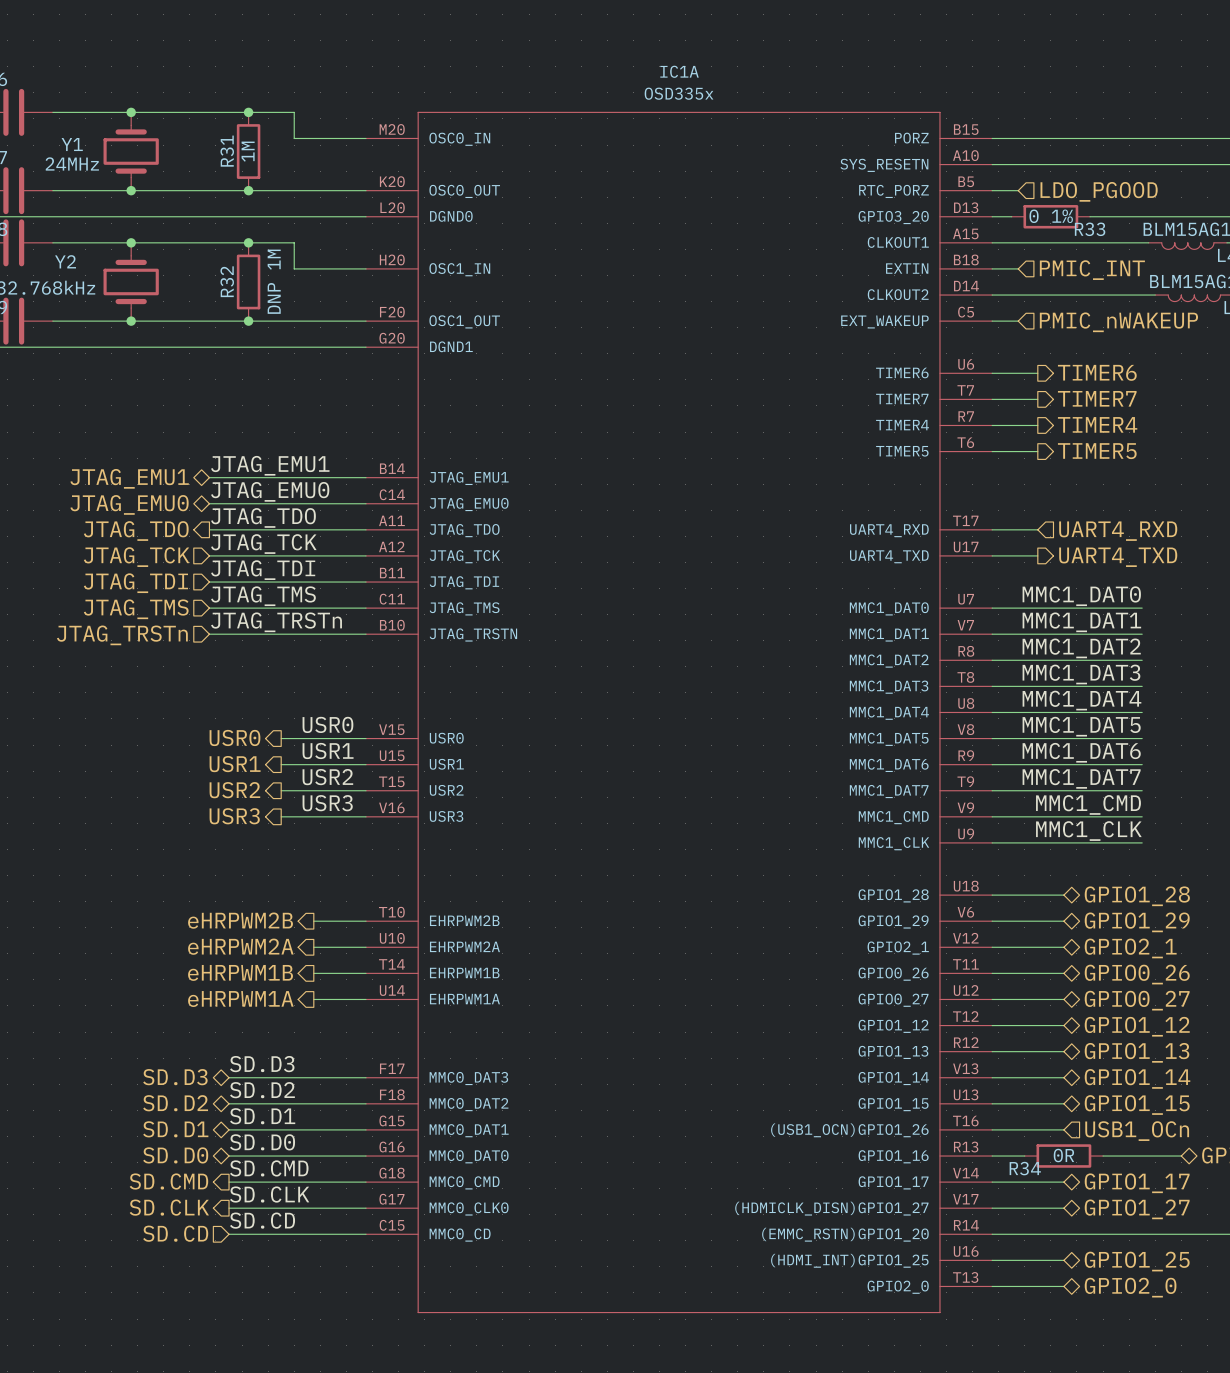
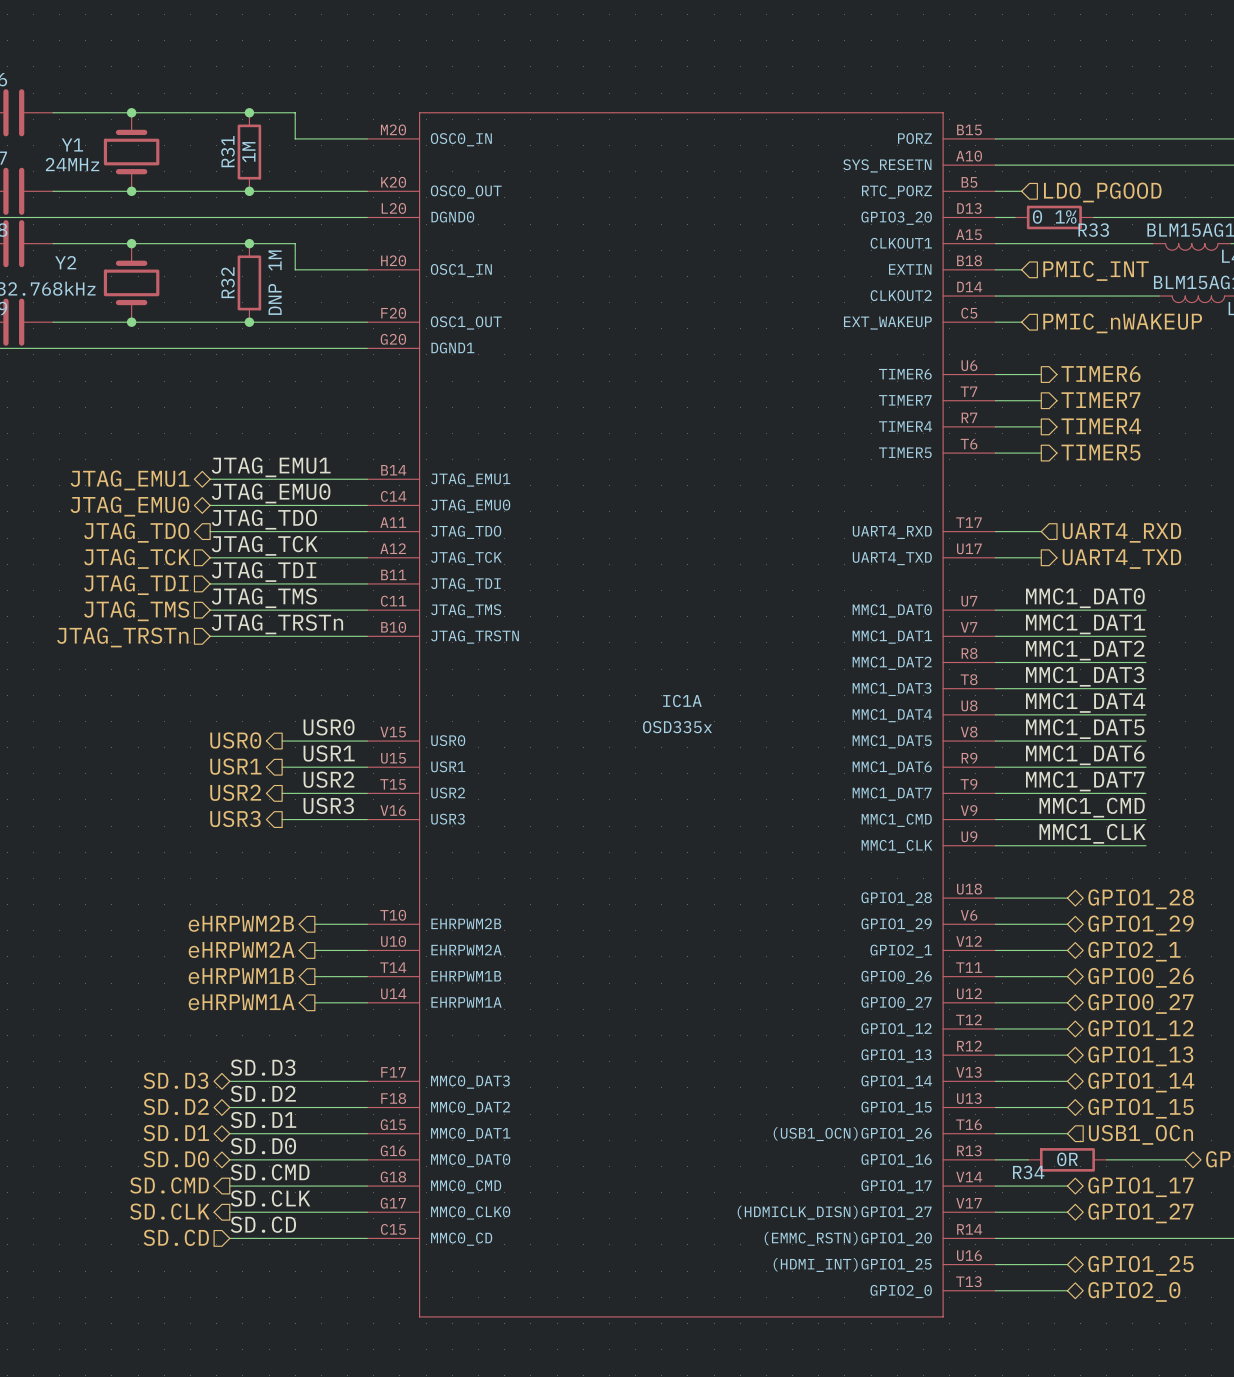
IC1A name position: IC1A (679, 71) -> IC1A (682, 700)
IC1A value position: OSD335x (679, 93) -> OSD335x (677, 727)

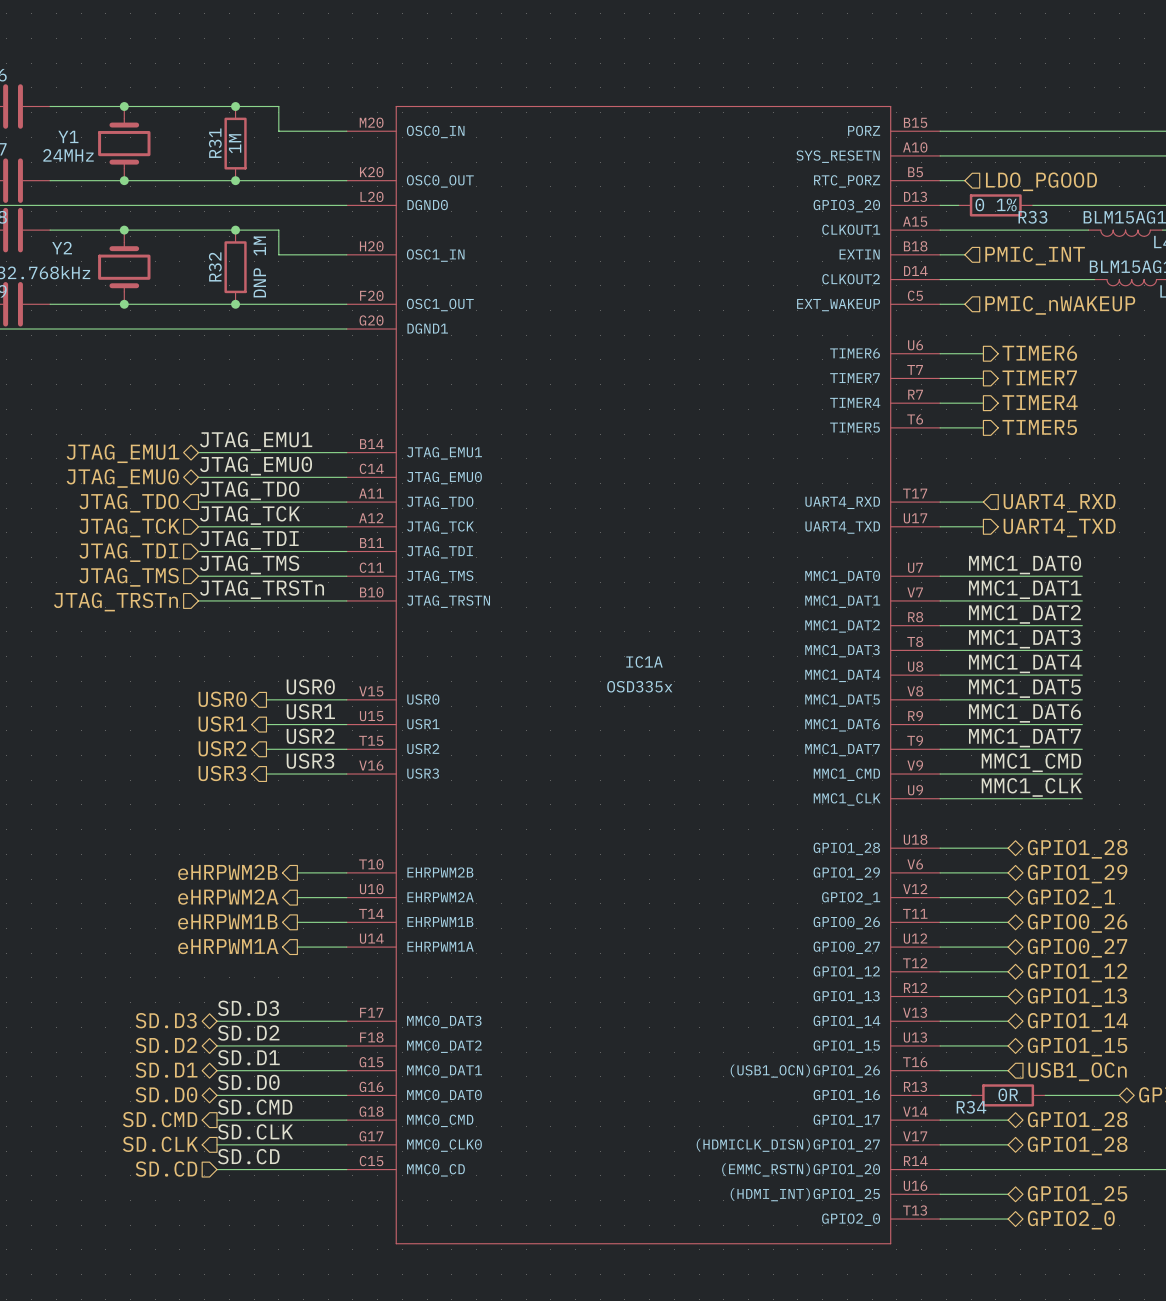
hierarchical label: GPIO1_17 (1140, 1187) -> GPIO1_28 (1077, 1121)
hierarchical label: GPIO1_27 (1140, 1213) -> GPIO1_28 (1077, 1145)

